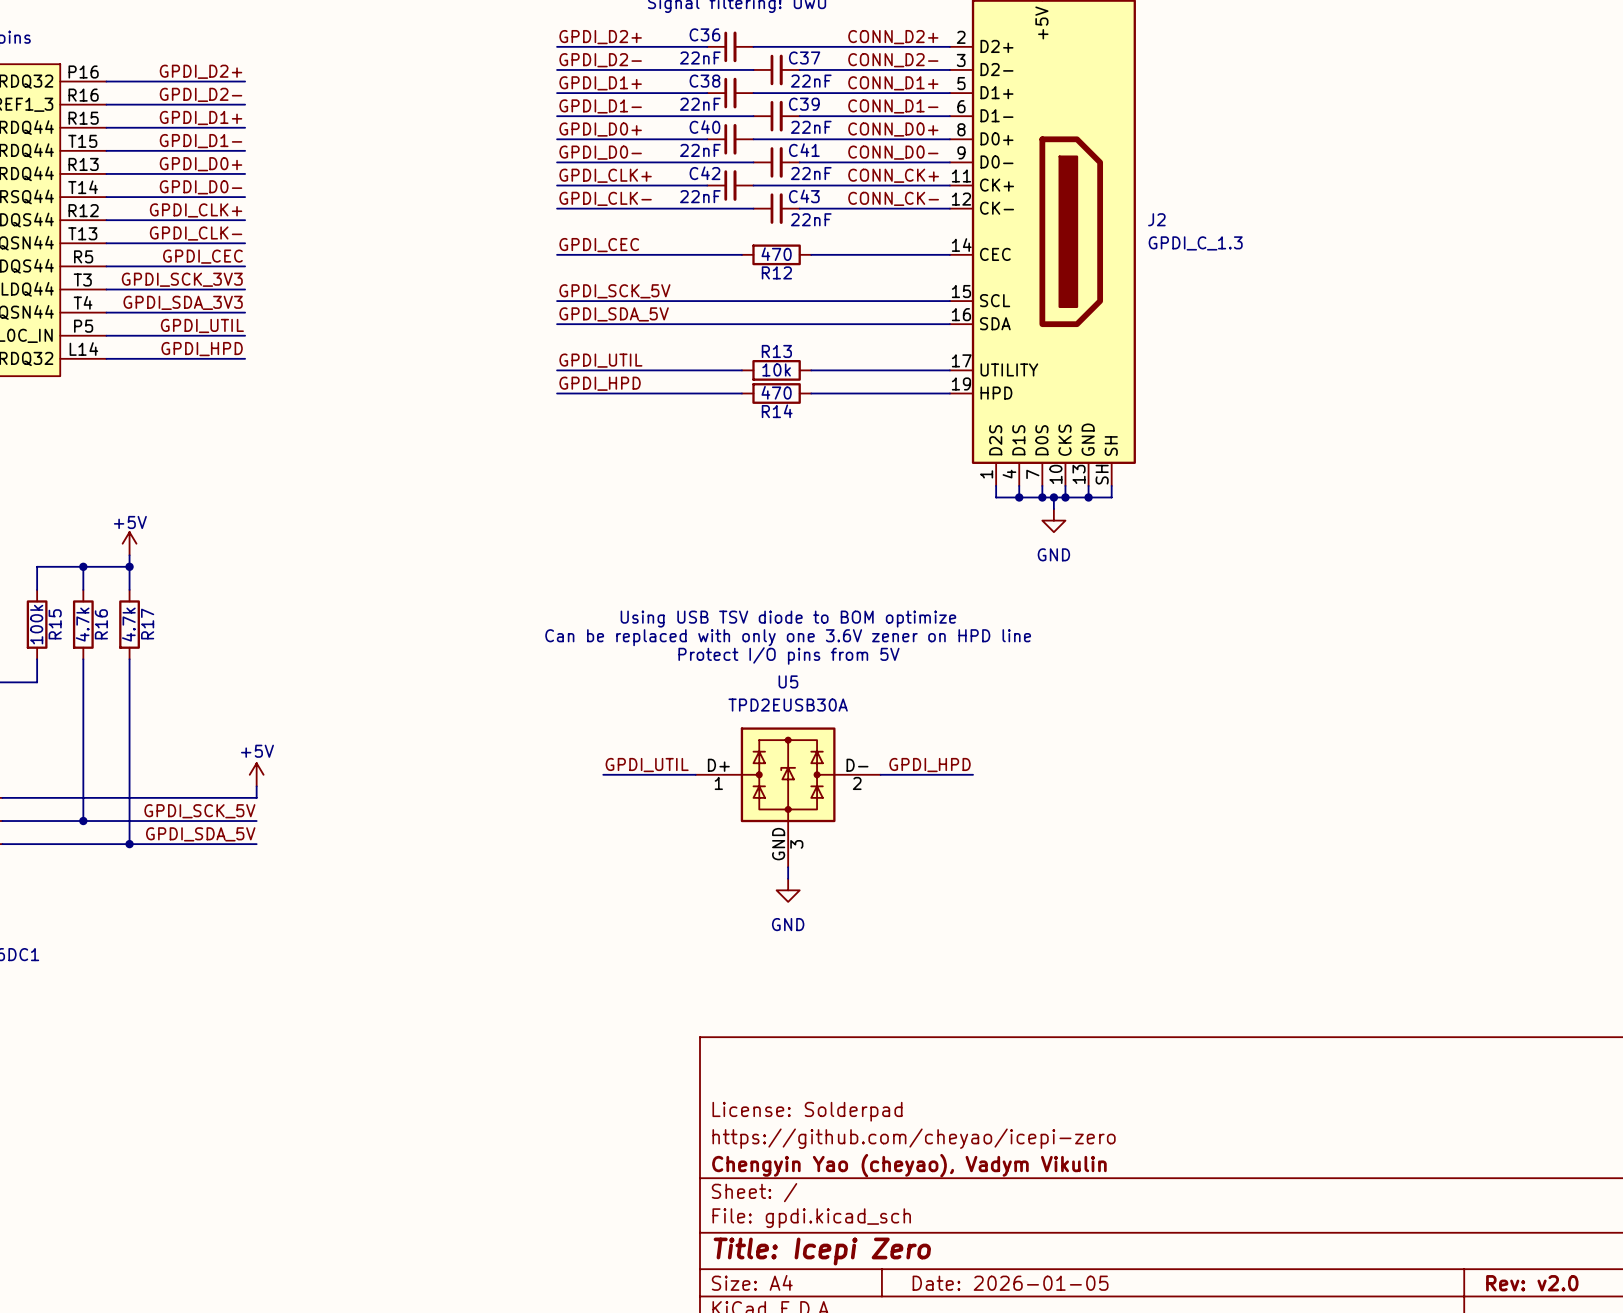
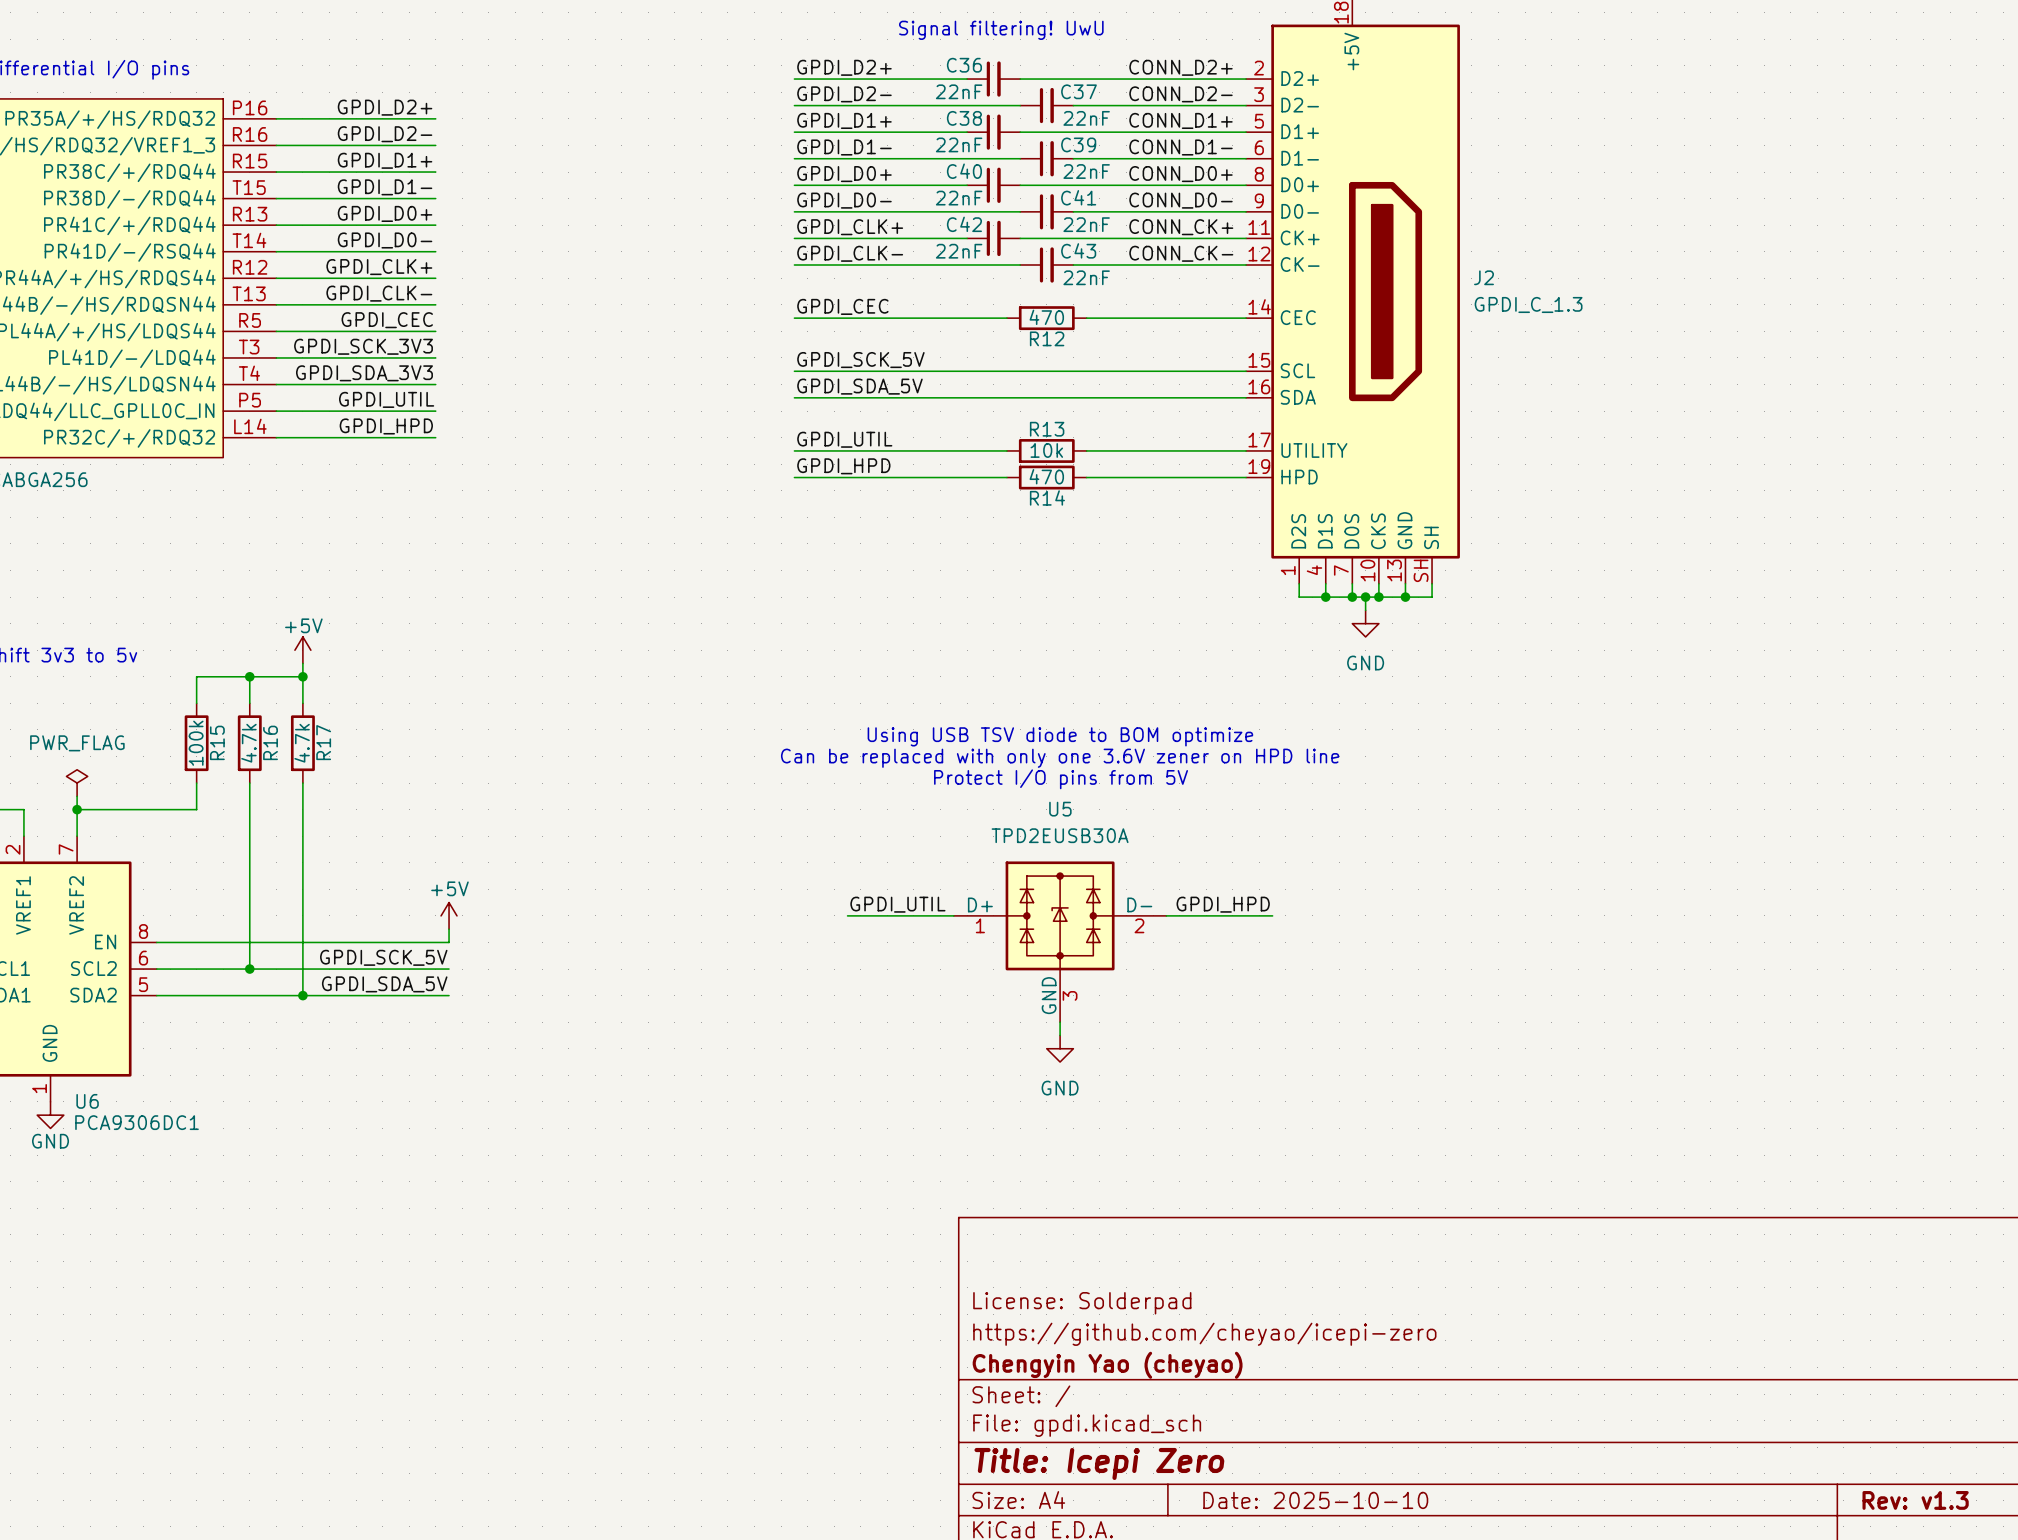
title block: Chengyin Yao (cheyao), Vadym Vikulin (909, 1165) -> Chengyin Yao (cheyao) (1107, 1365)
title block: Date: 2026-01-05 (1010, 1283) -> Date: 2025-10-10 (1315, 1500)
title block: Rev: v2.0 (1532, 1283) -> Rev: v1.3 (1915, 1500)

